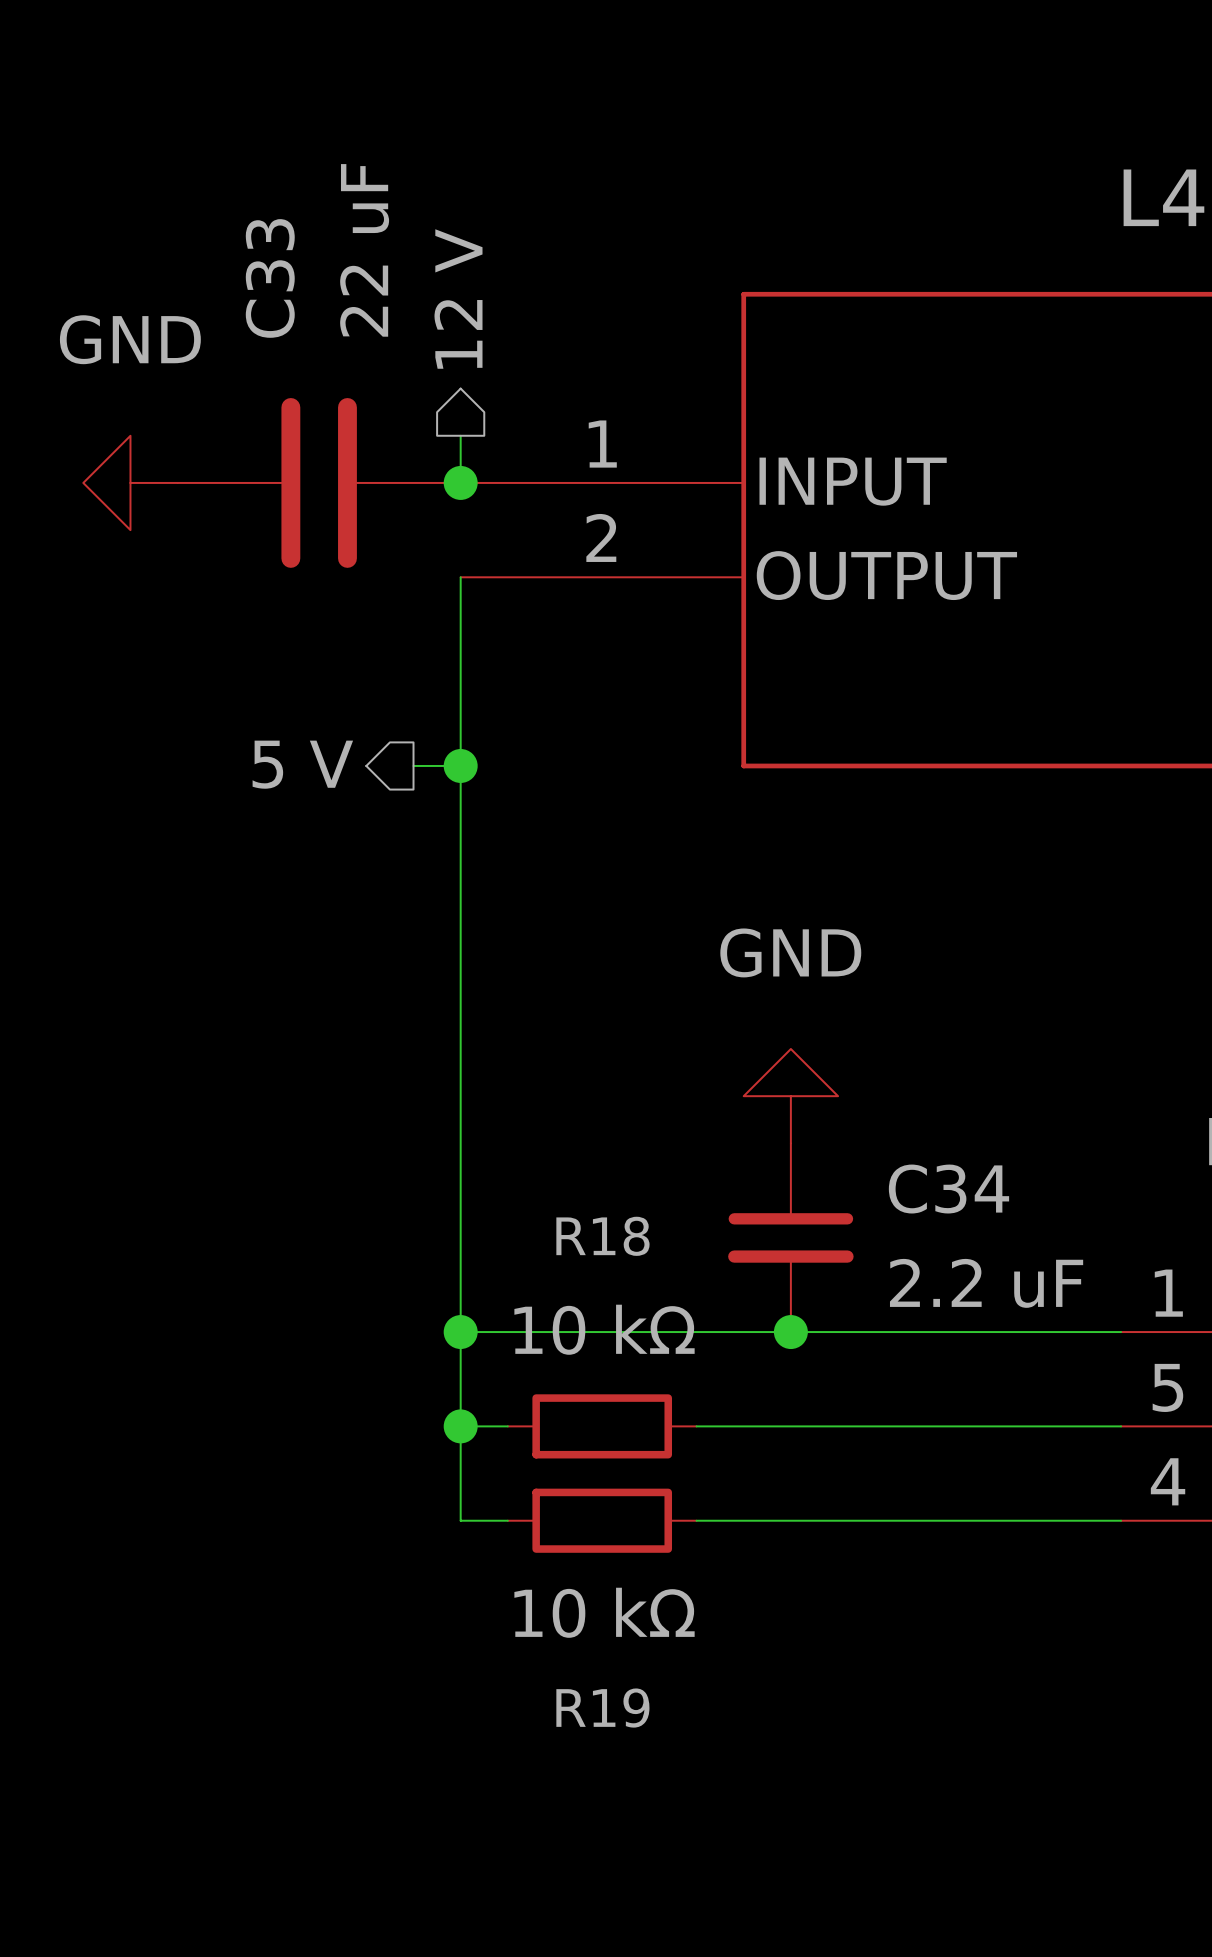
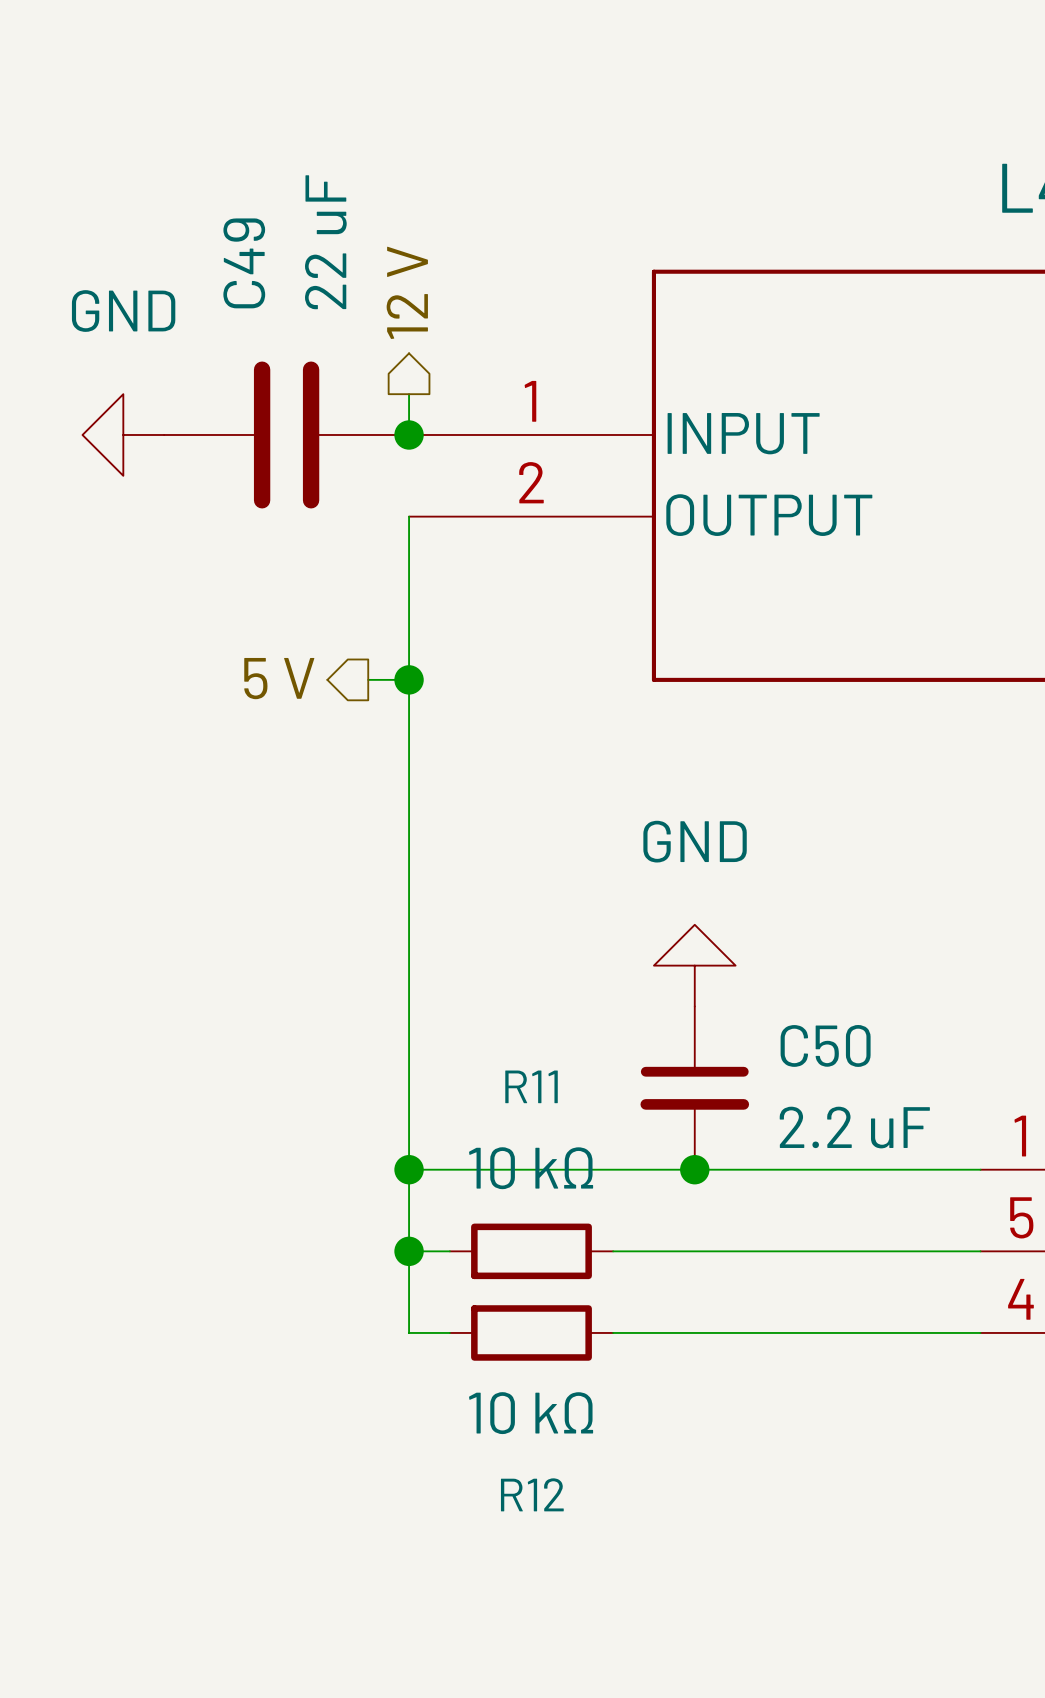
C33 name: C33 (270, 278) -> C49 (244, 263)
C34 name: C34 (948, 1189) -> C50 (825, 1045)
R18 name: R18 (602, 1236) -> R11 (531, 1086)
R19 name: R19 (602, 1708) -> R12 (532, 1494)

